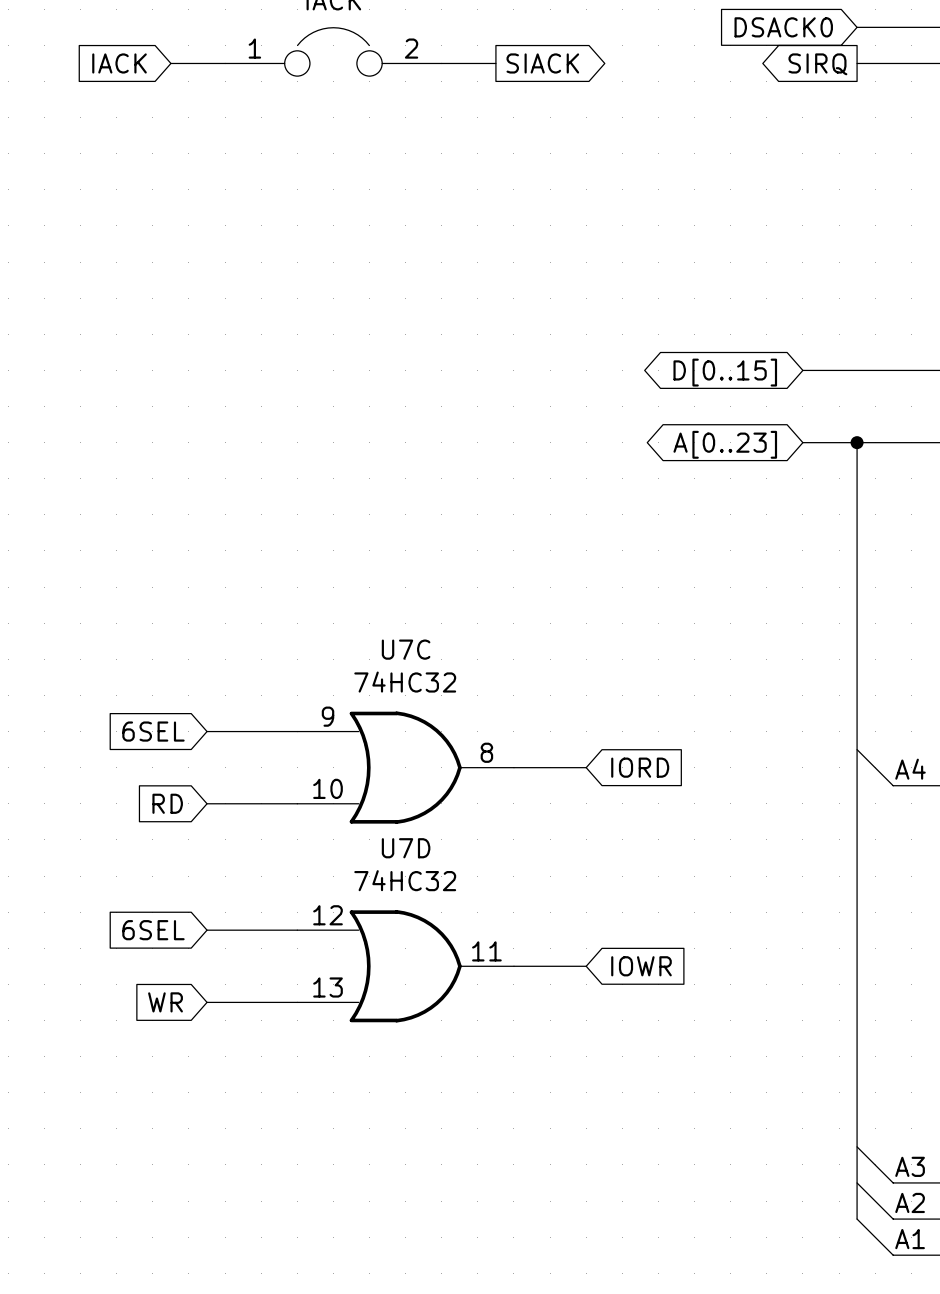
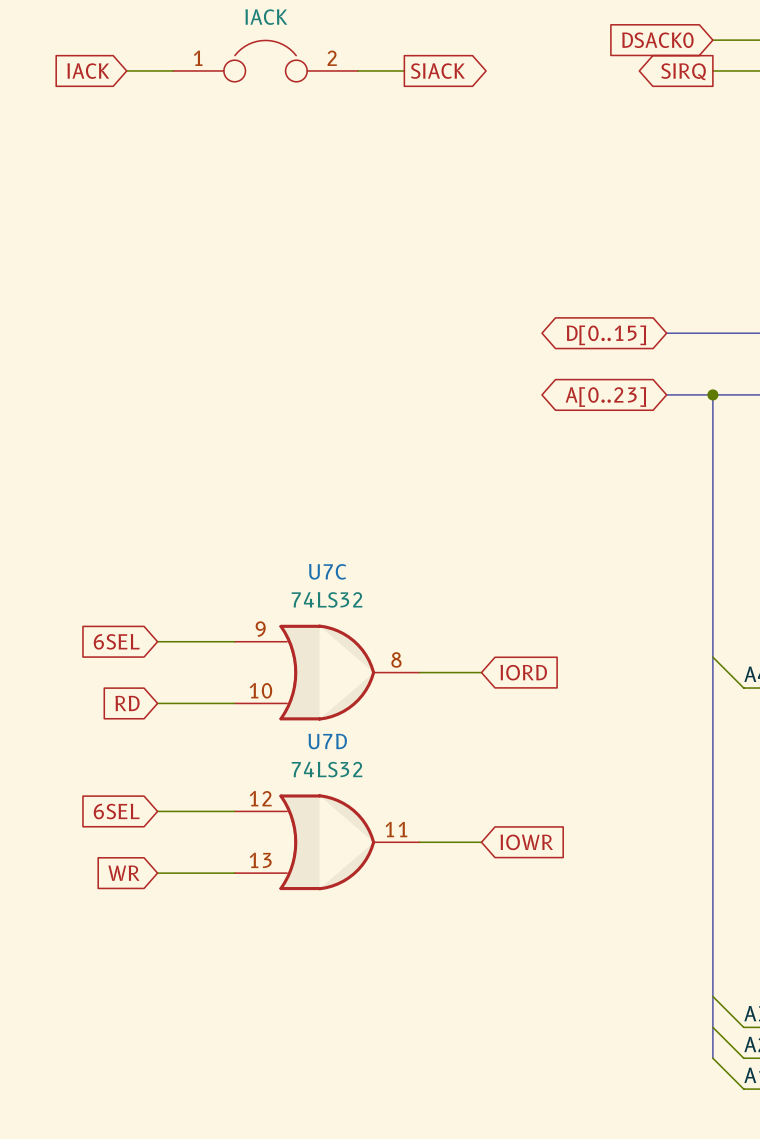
U7C value: 74HC32 (405, 682) -> 74LS32 (327, 599)
U7D value: 74HC32 (405, 880) -> 74LS32 (327, 769)

